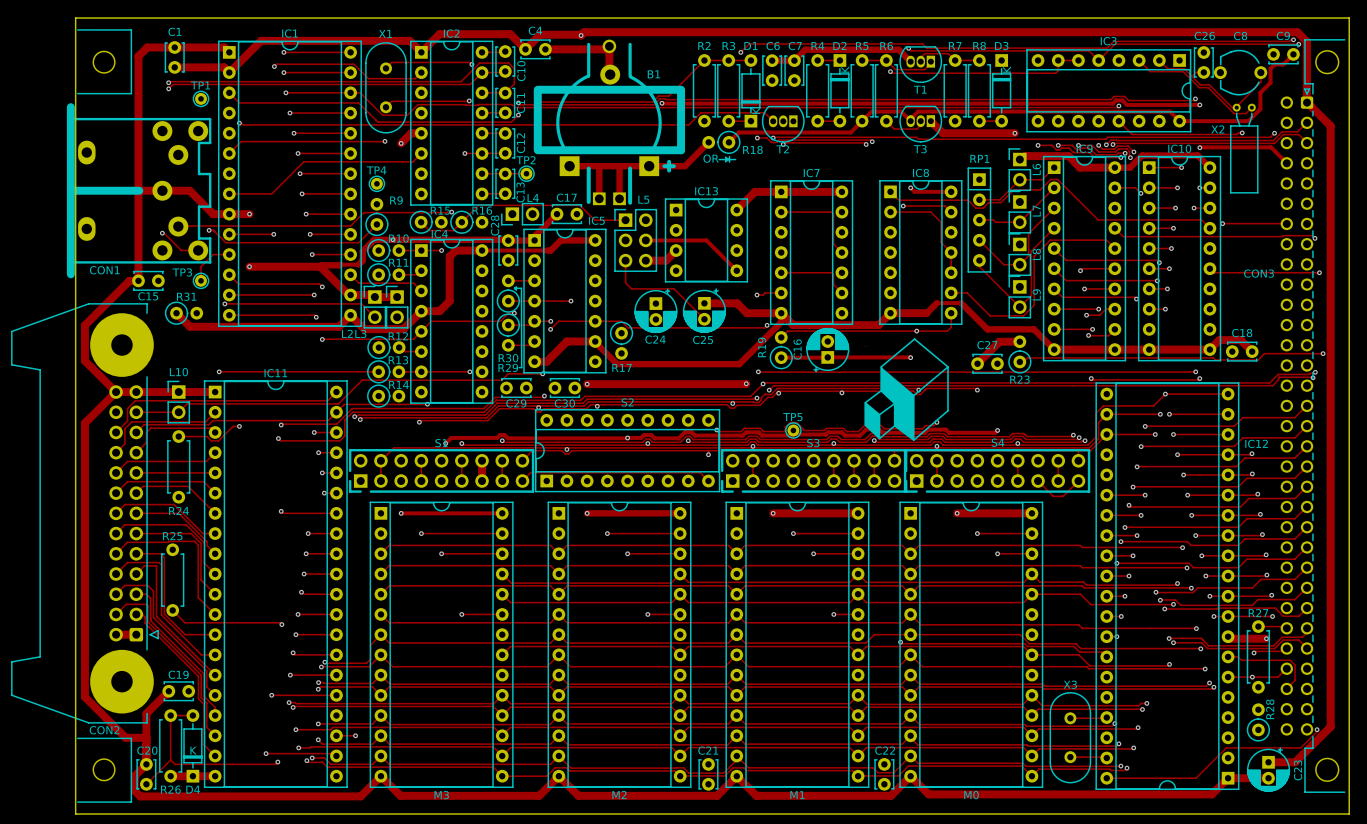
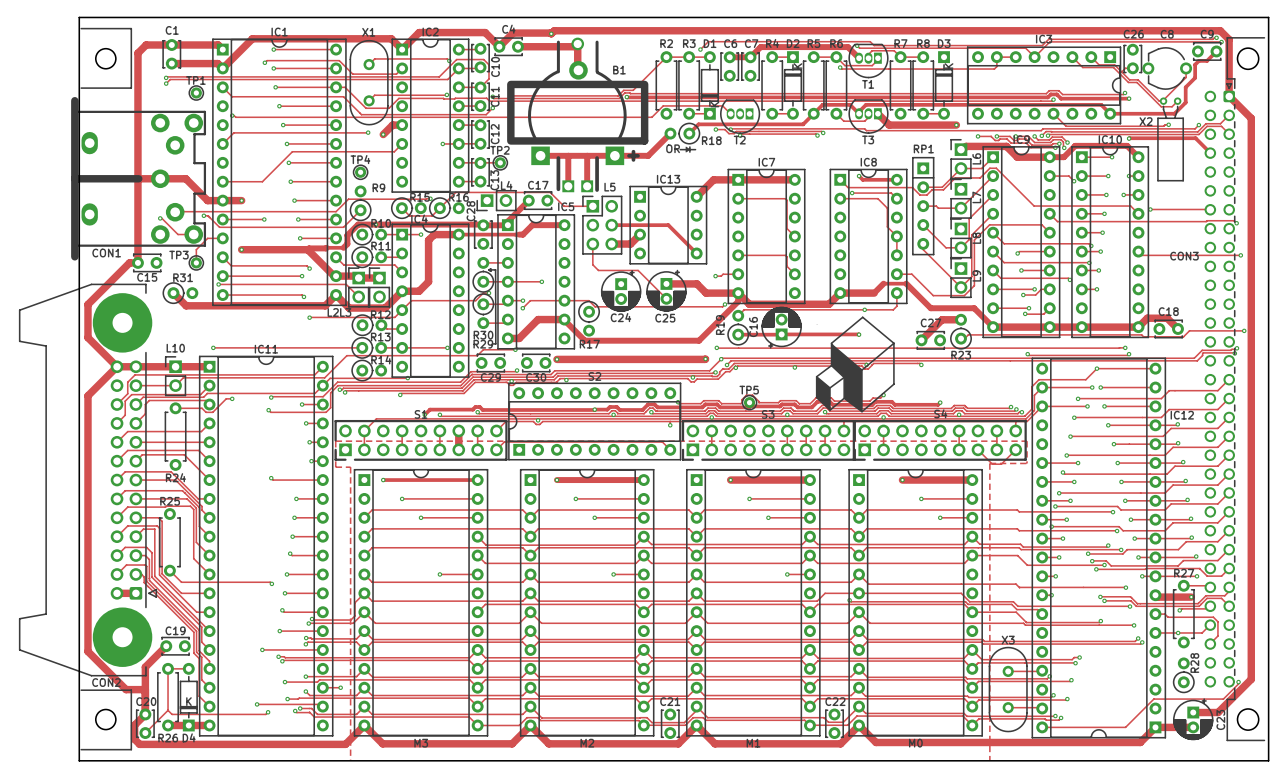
zone outline: none -> (350, 760) (350, 467) (335, 467) (335, 441) (1027, 441) (1027, 463) (989, 463) (989, 760)

